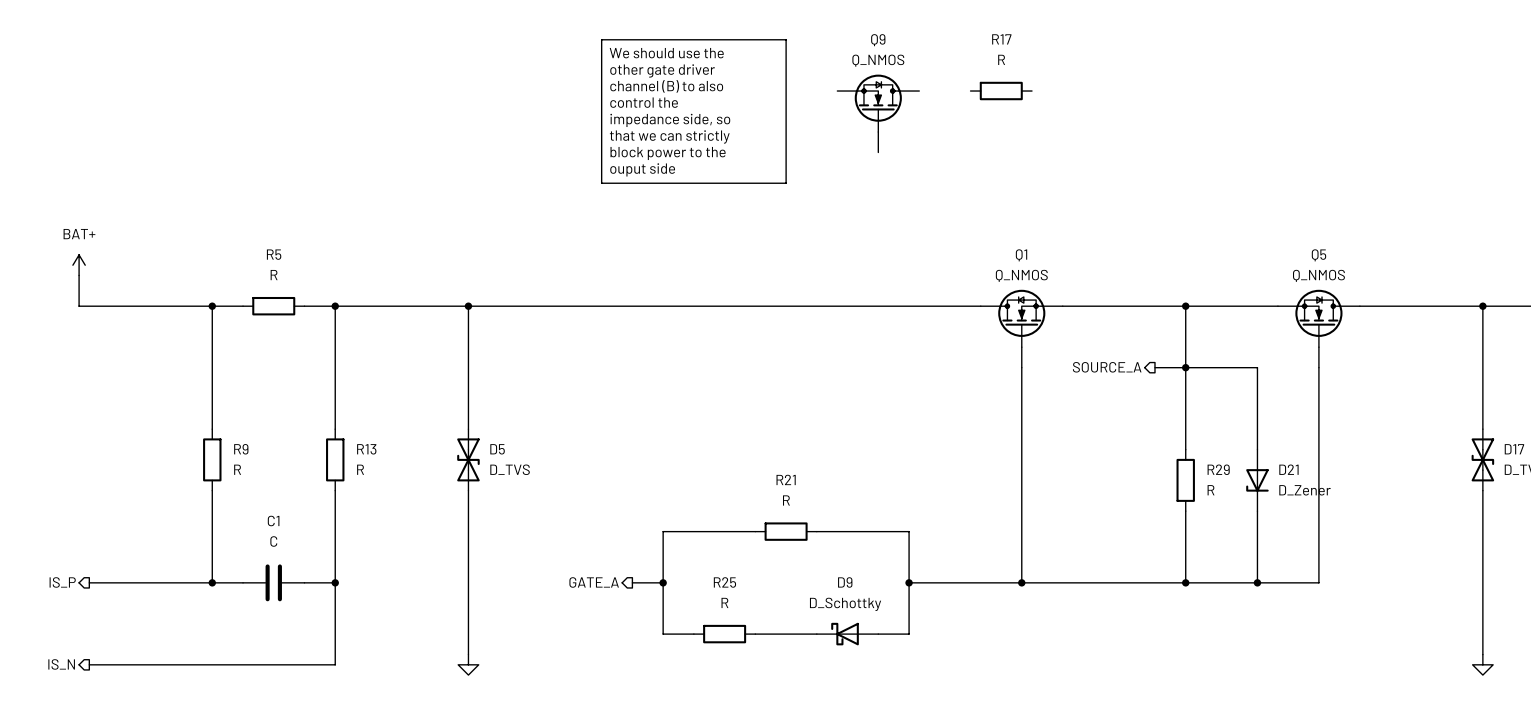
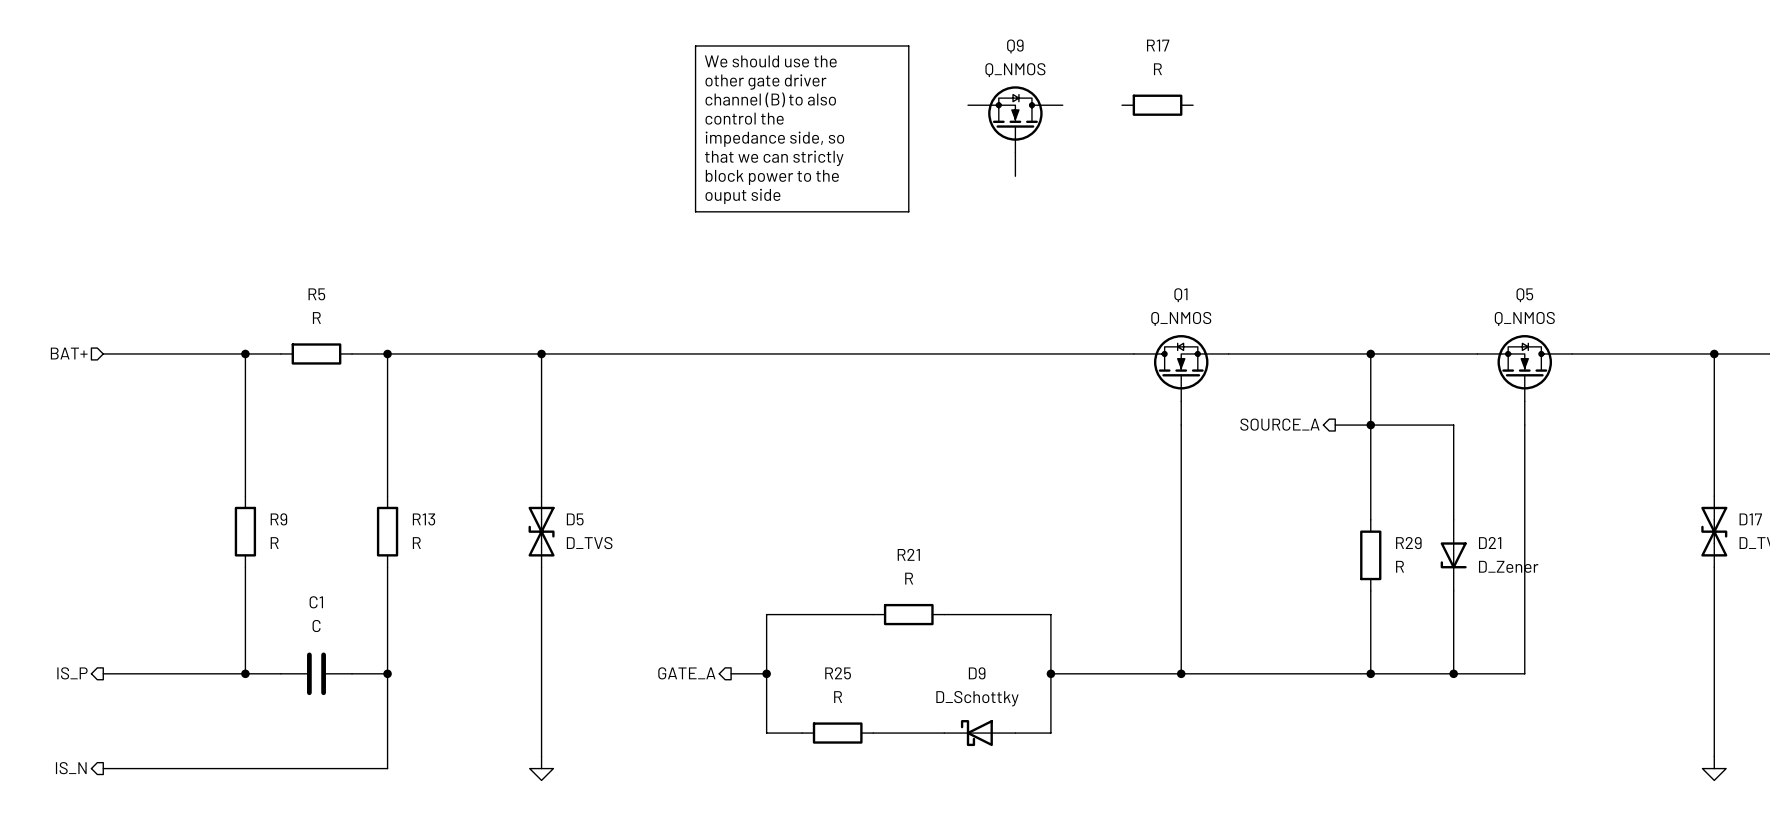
power symbol: BAT+ (79, 265) -> none
wire: (79, 275) (79, 306) (89, 306) -> none
hierarchical label: none -> BAT+ (69, 353)

